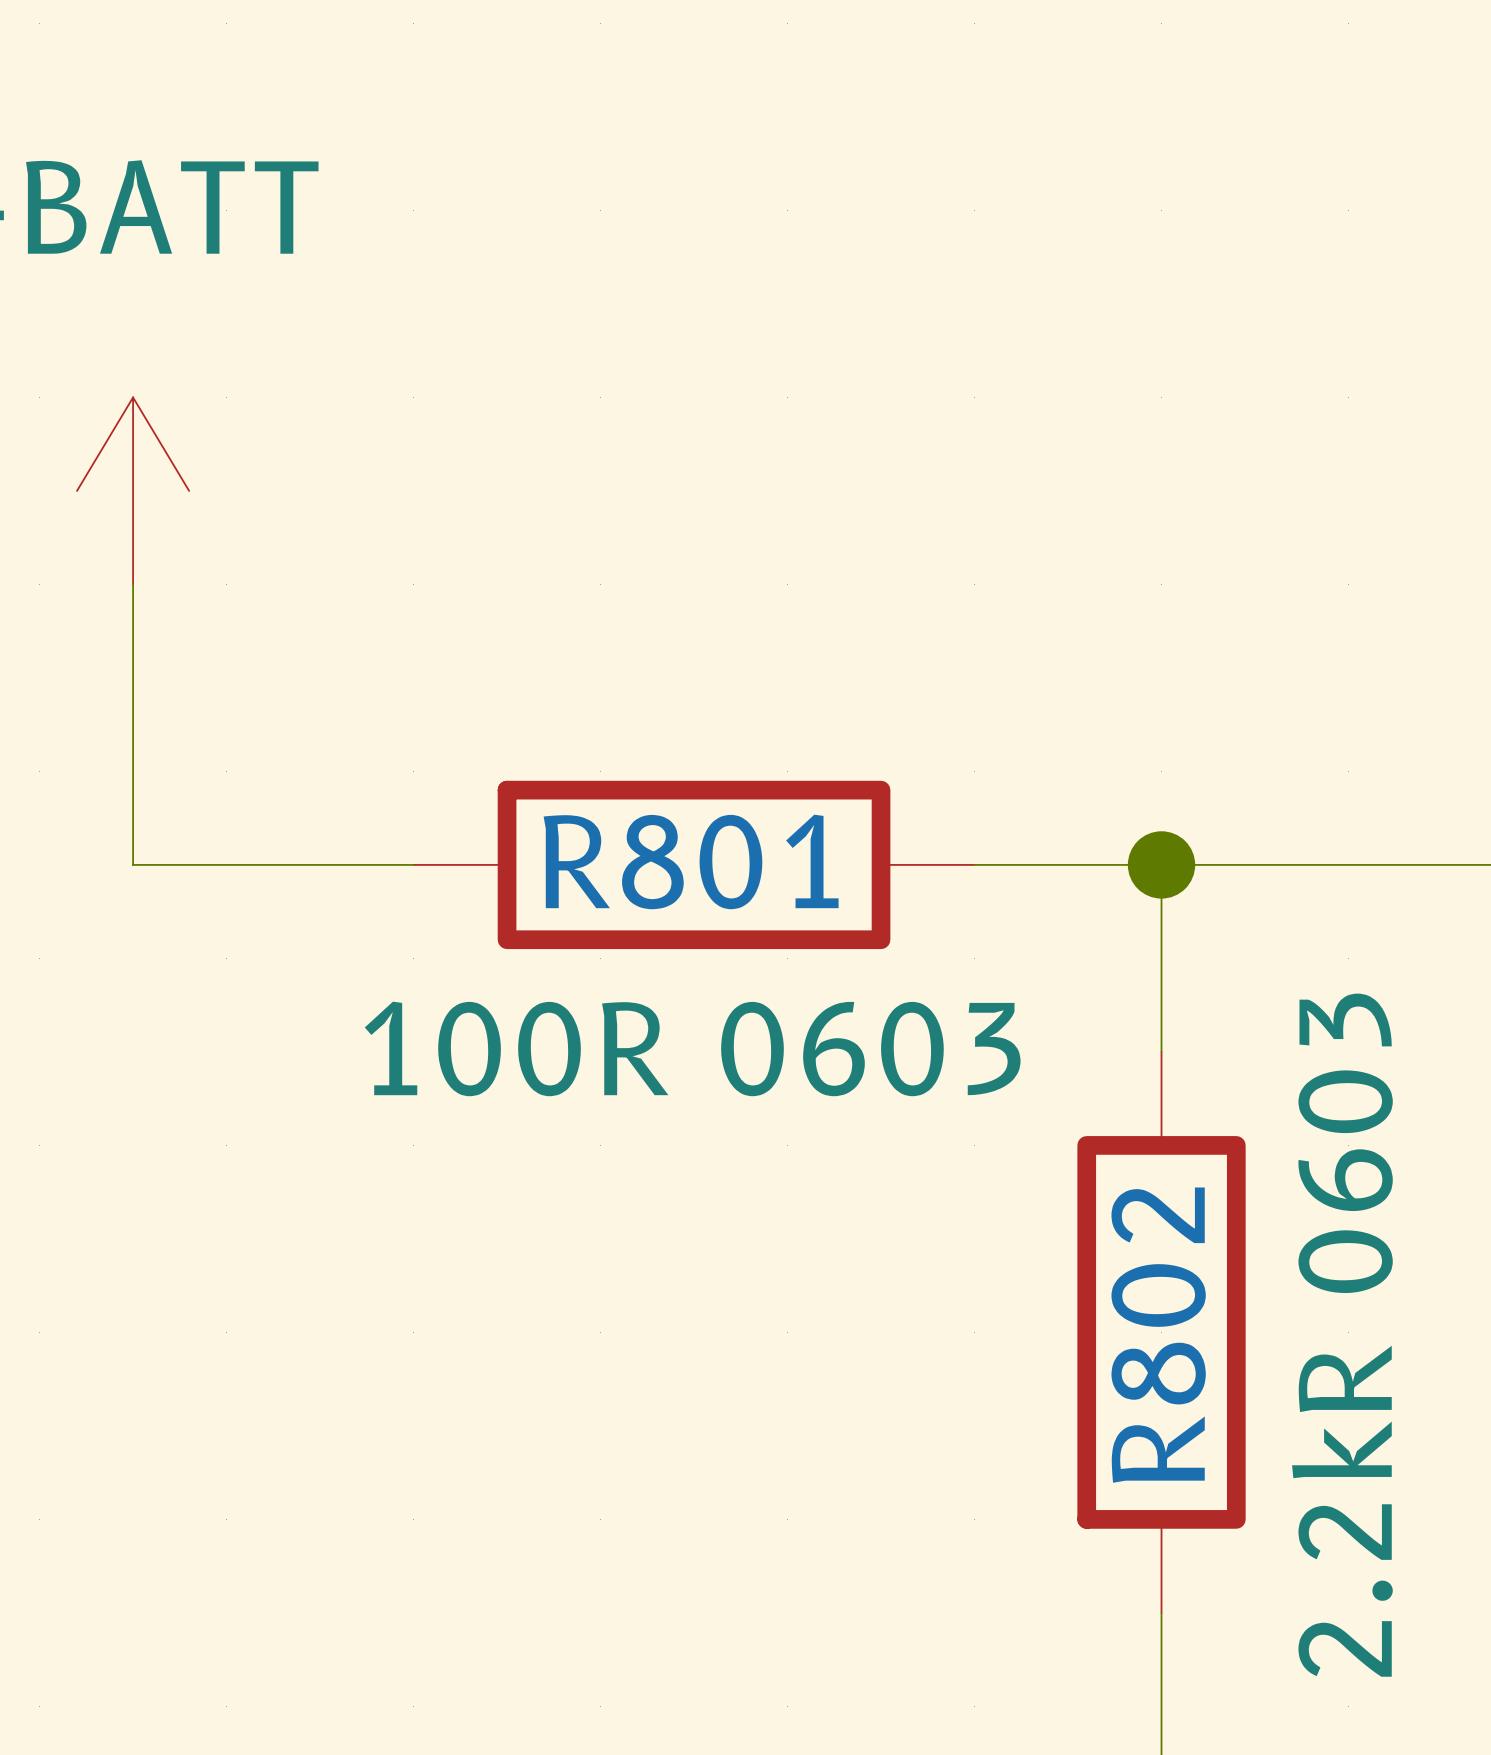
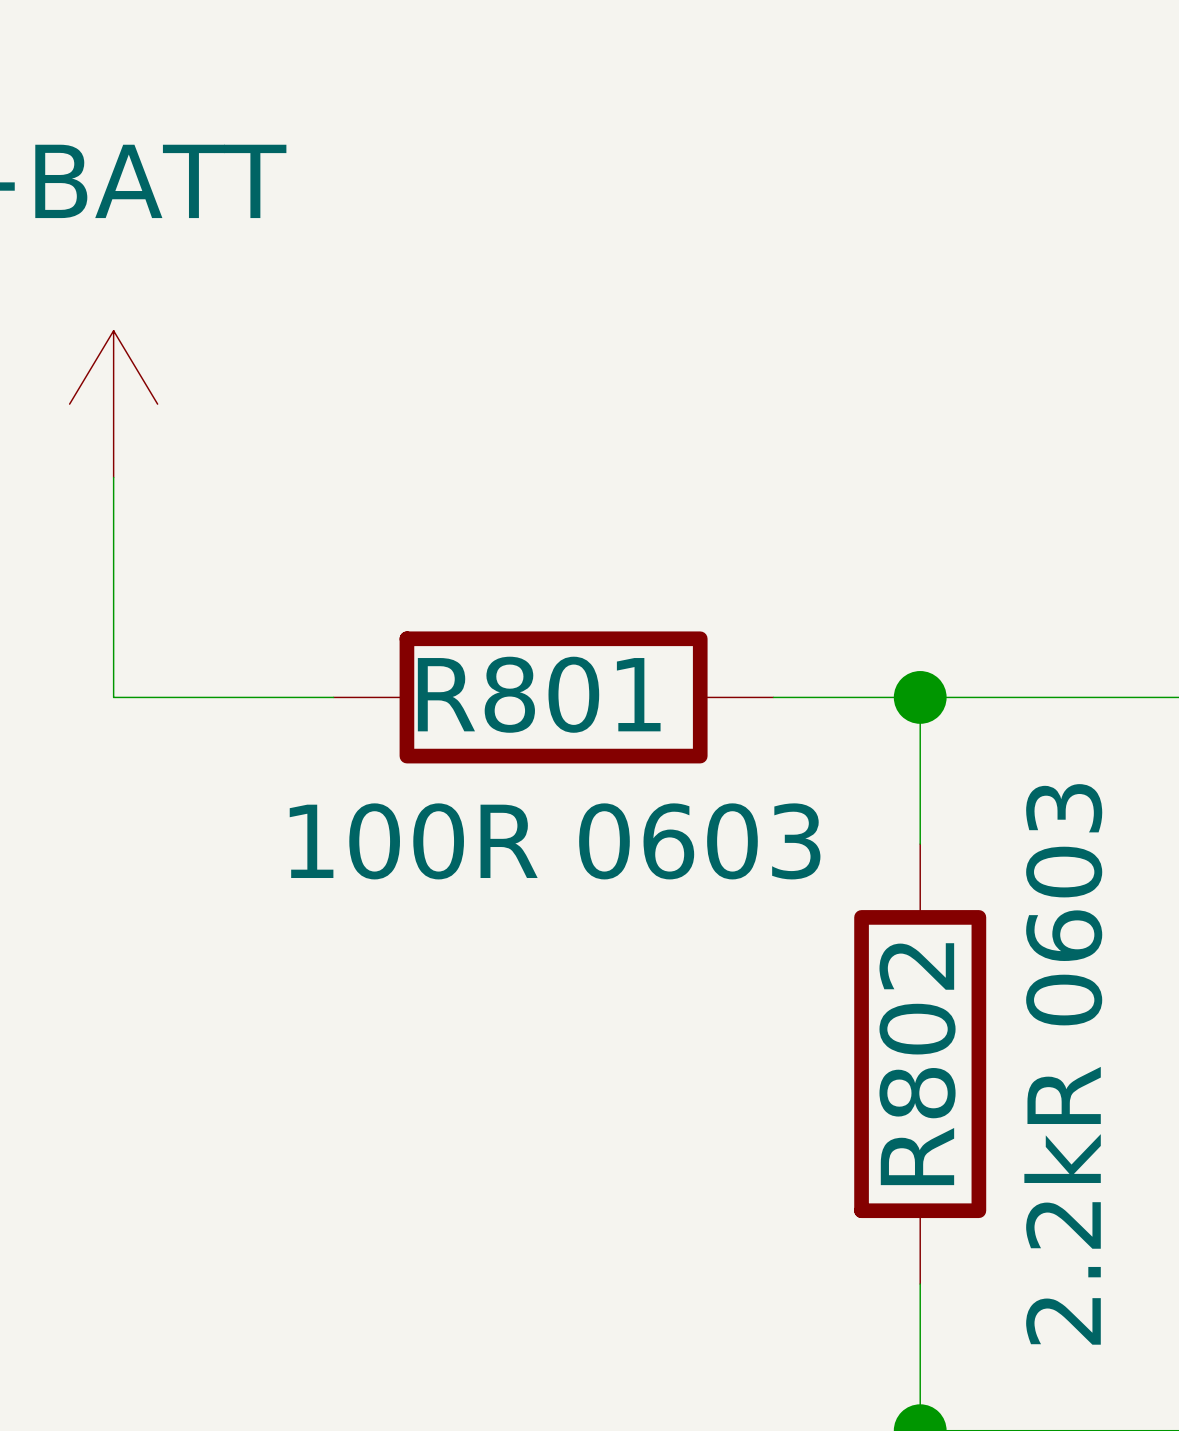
R801 name position: R801 (691, 861) -> R801 (539, 694)

